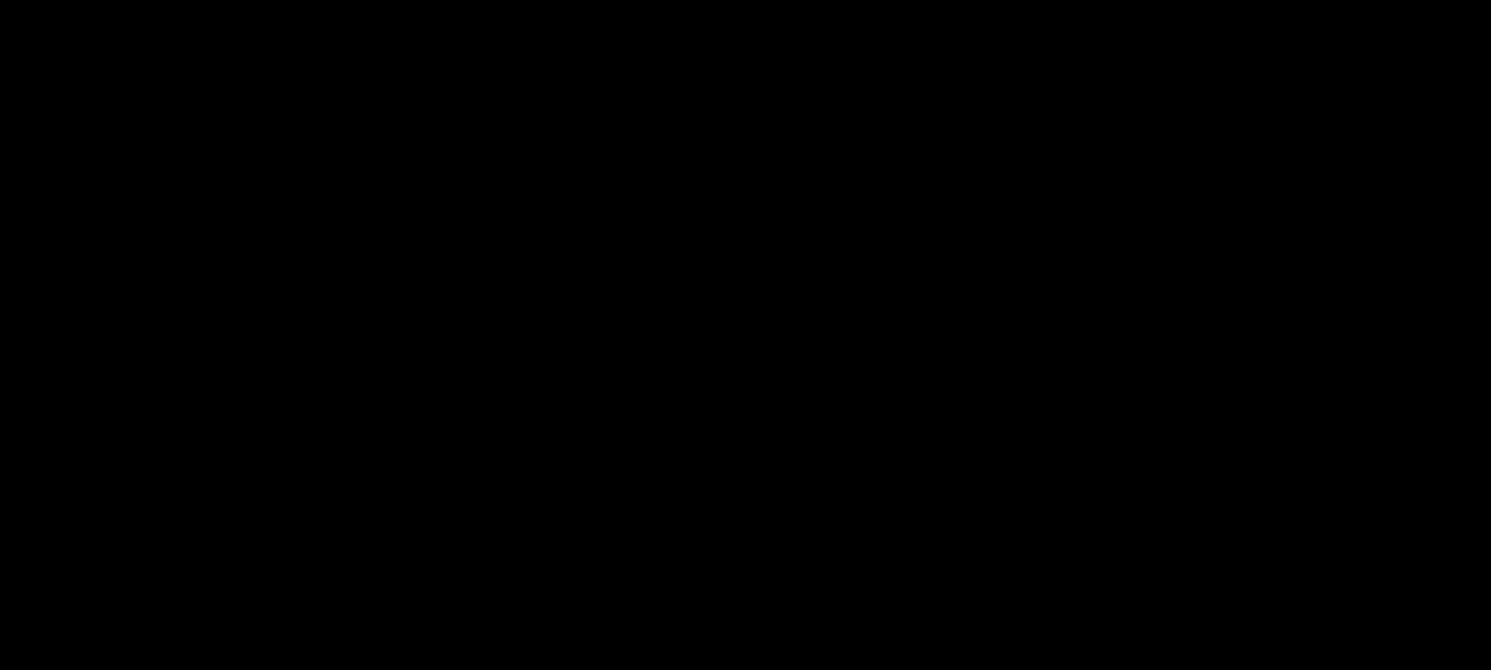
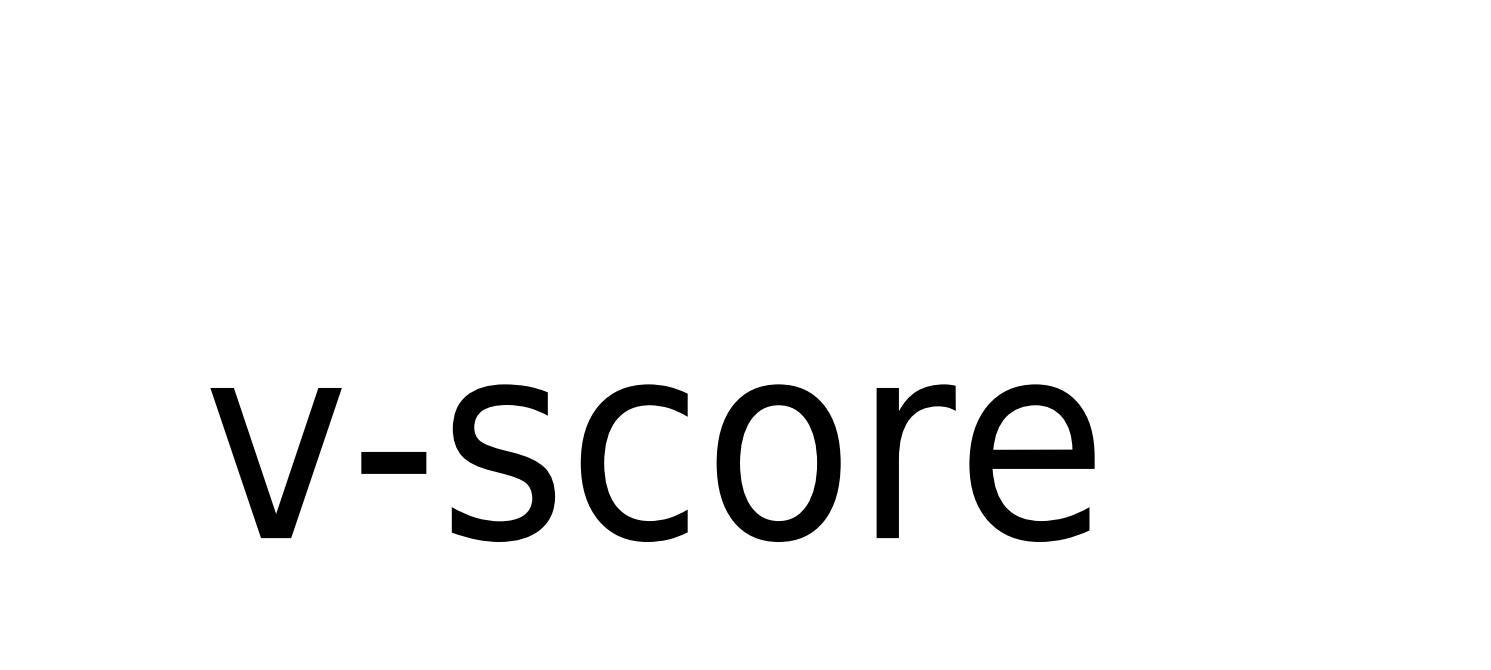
text: none -> v-score (652, 463)

